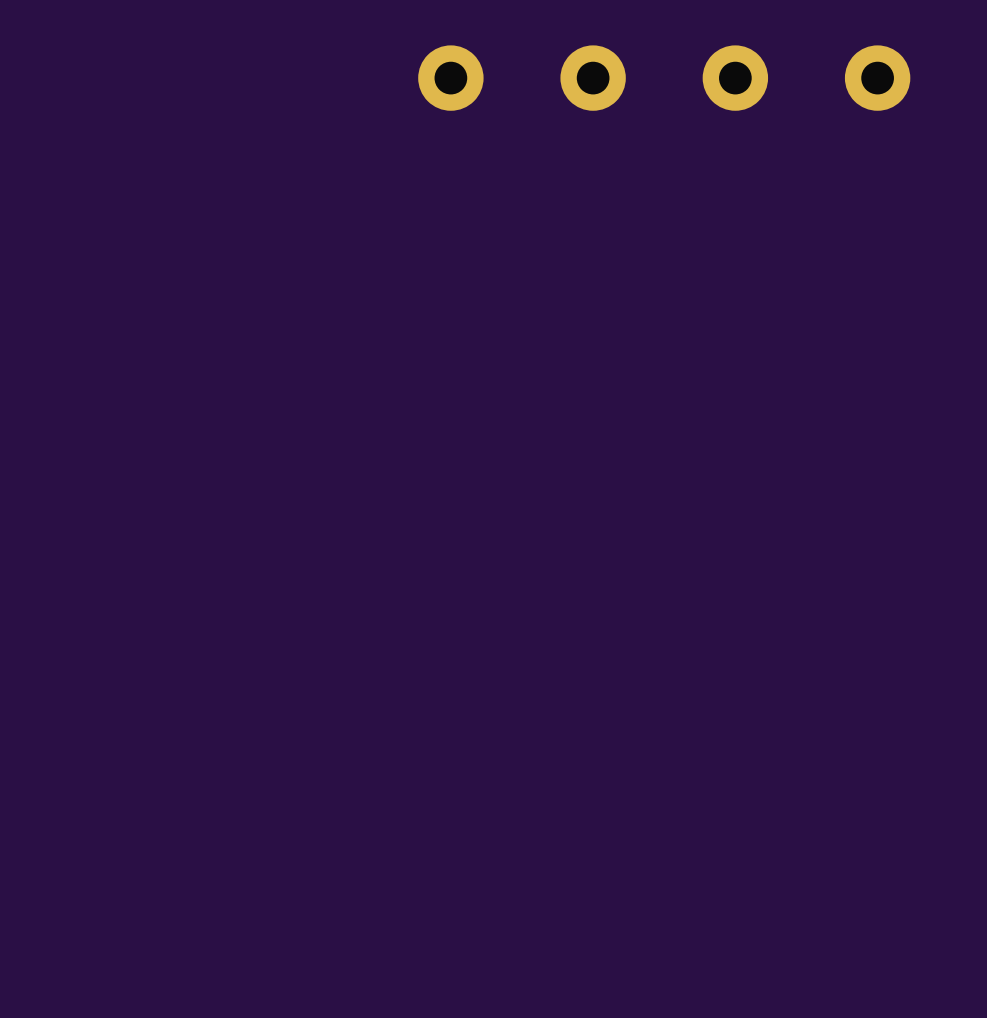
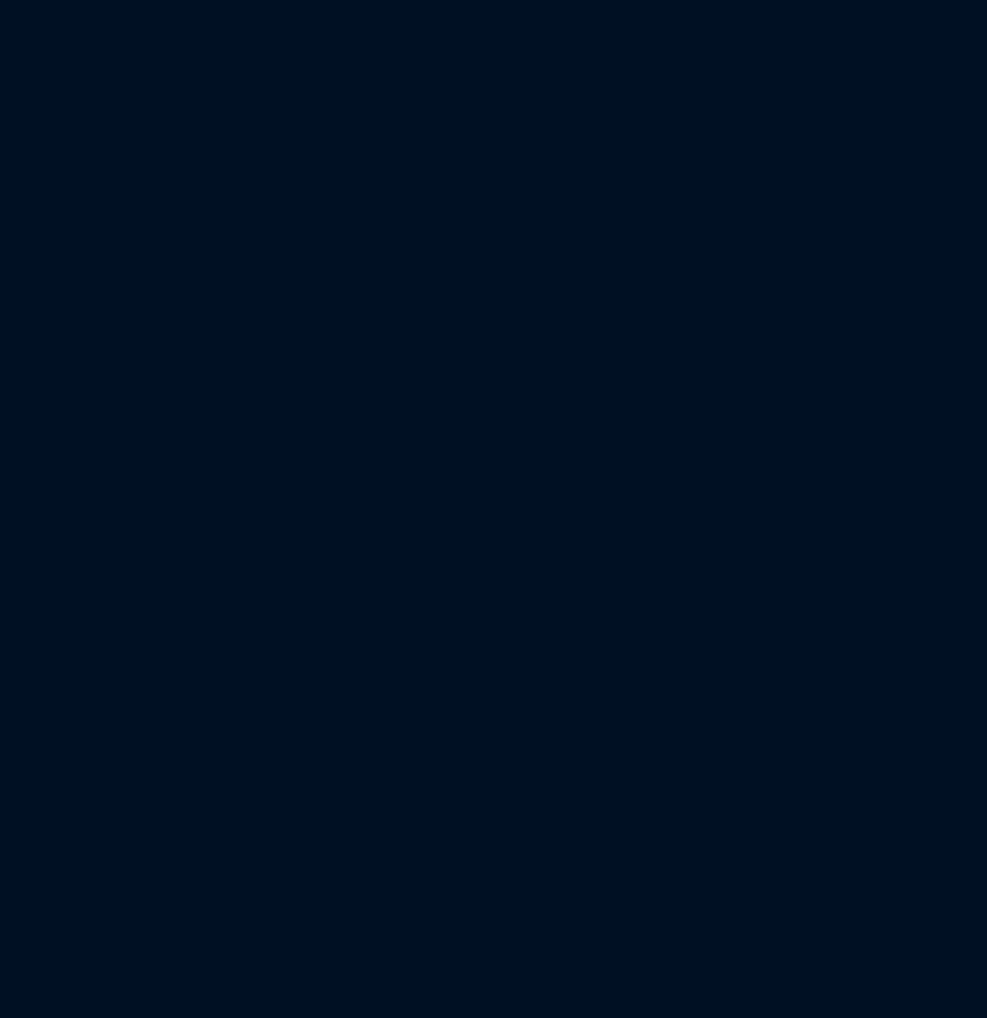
part: (450, 78) -> none
part: (593, 78) -> none
part: (735, 78) -> none
part: (877, 78) -> none

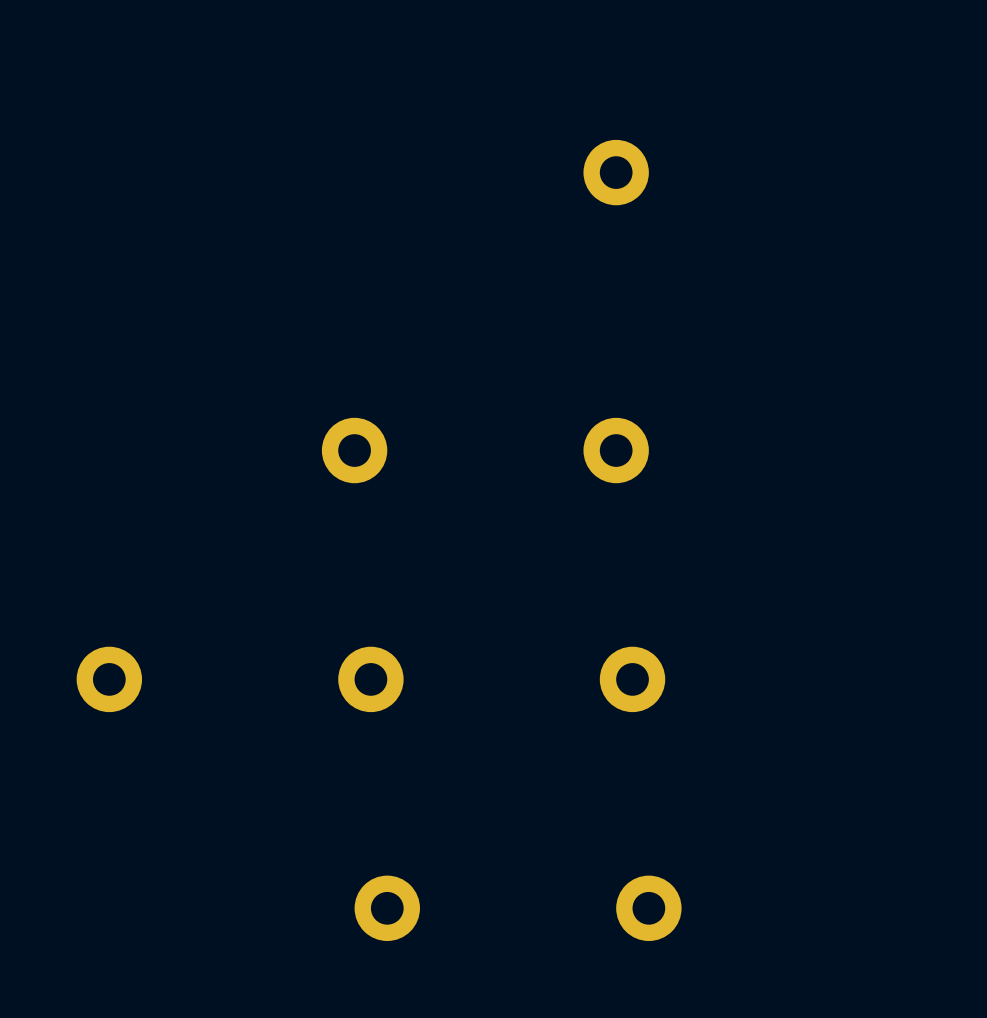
part: none -> (616, 172)
part: none -> (354, 450)
part: none -> (616, 450)
part: none -> (109, 679)
part: none -> (370, 679)
part: none -> (632, 679)
part: none -> (387, 908)
part: none -> (648, 908)

